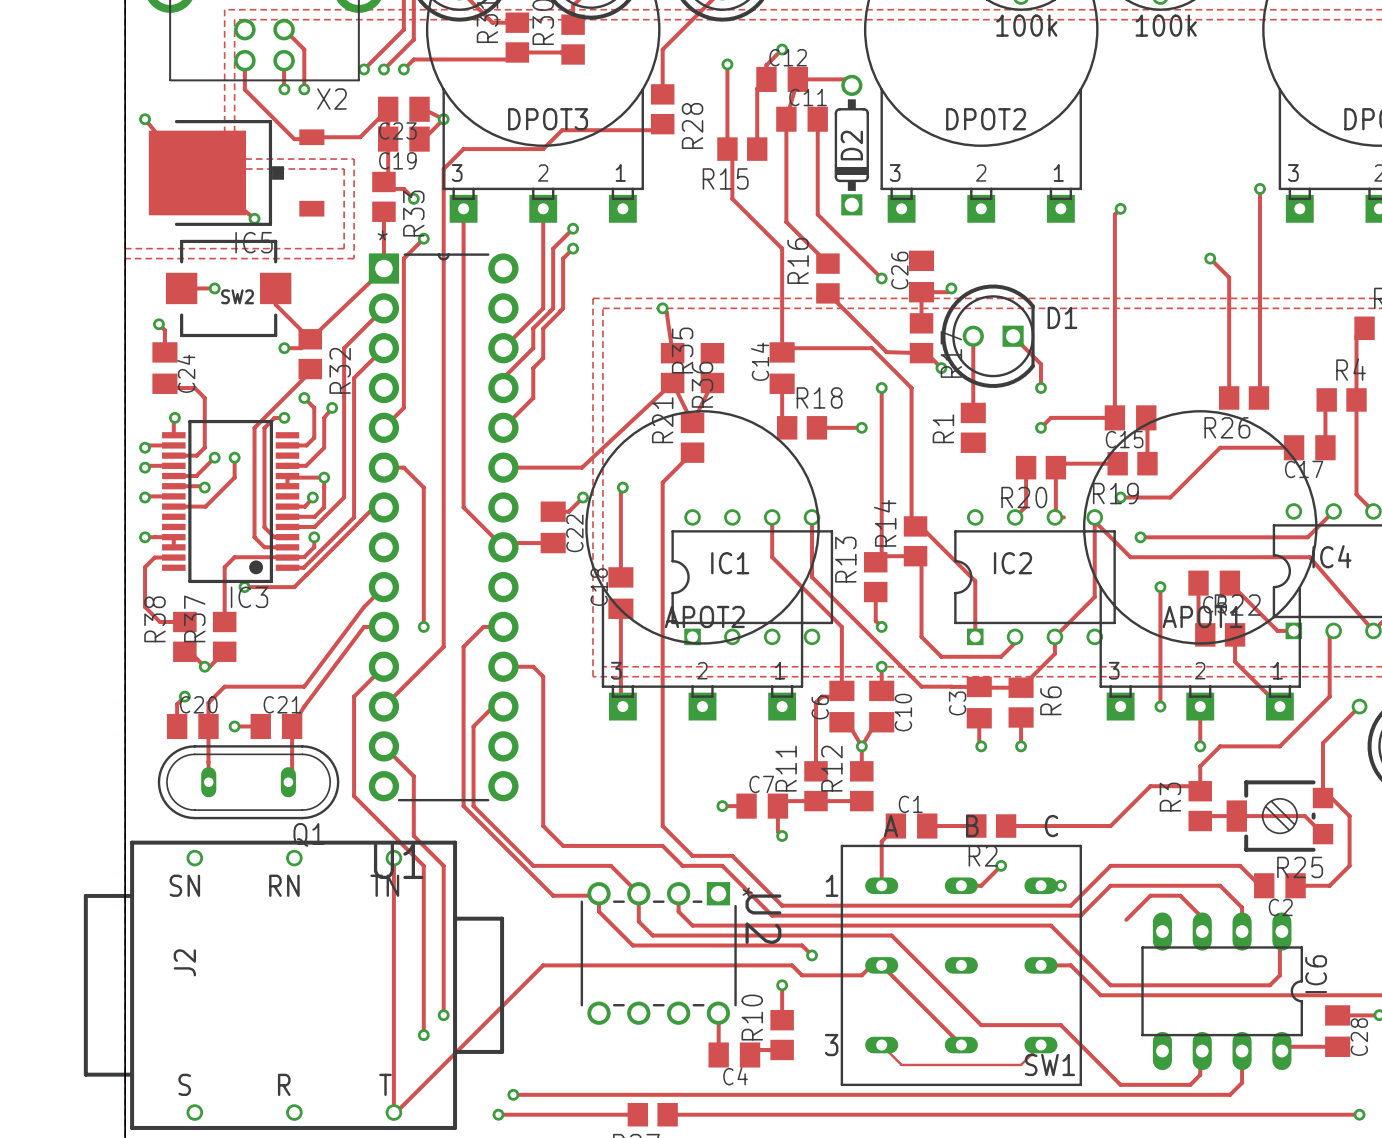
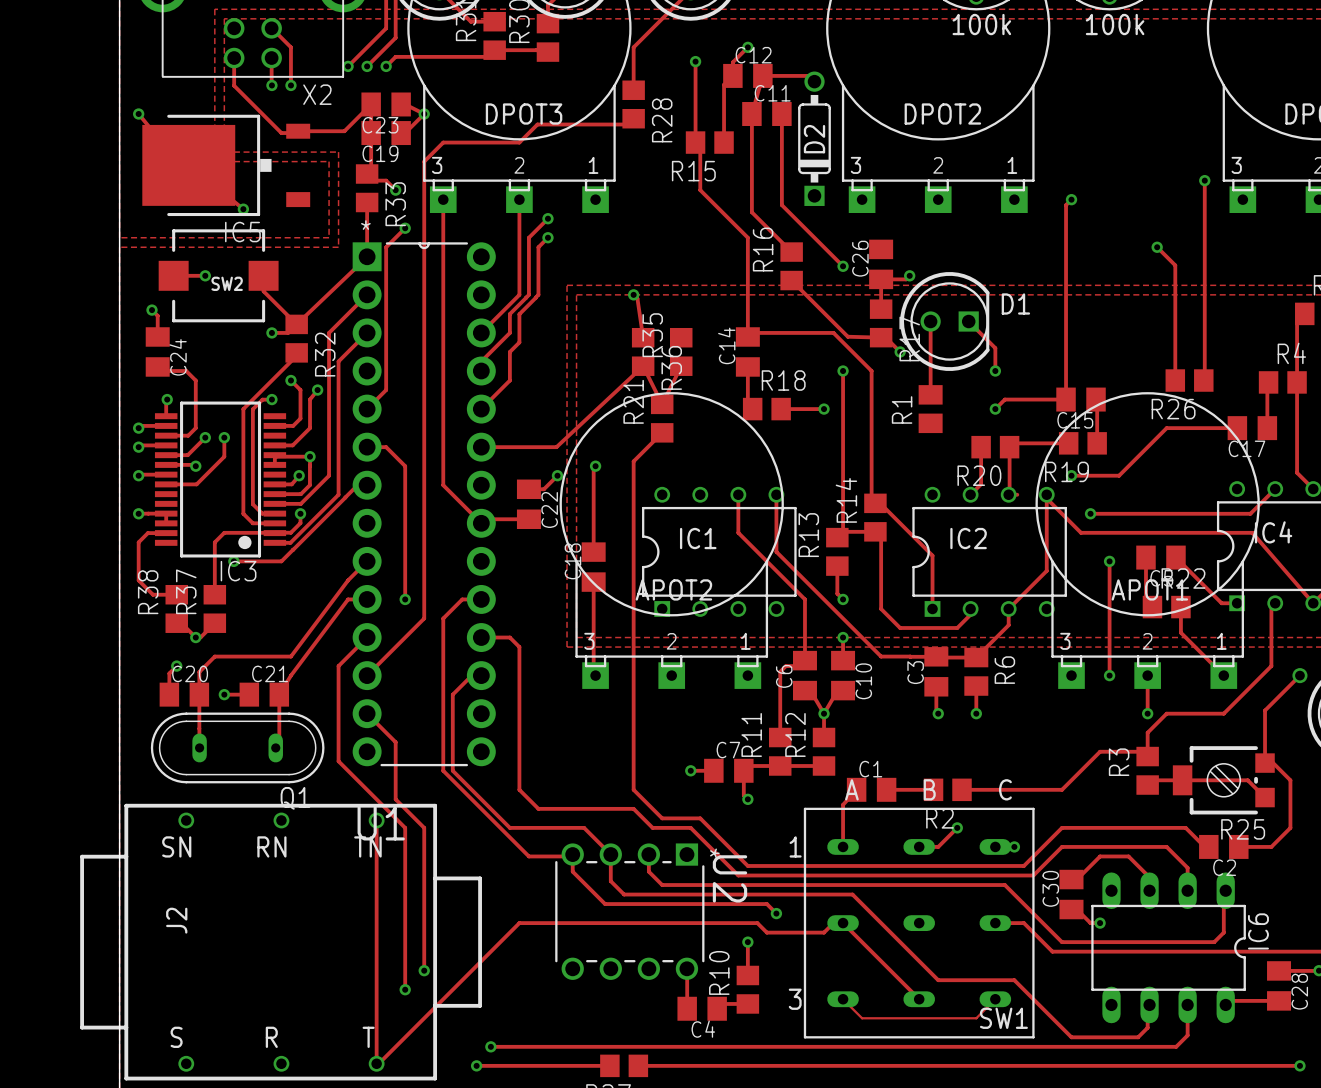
C30: none -> (1071, 894)
track: none -> (1071, 909) (1076, 909) (1090, 923) (1100, 923)
via: none -> (1100, 923)

